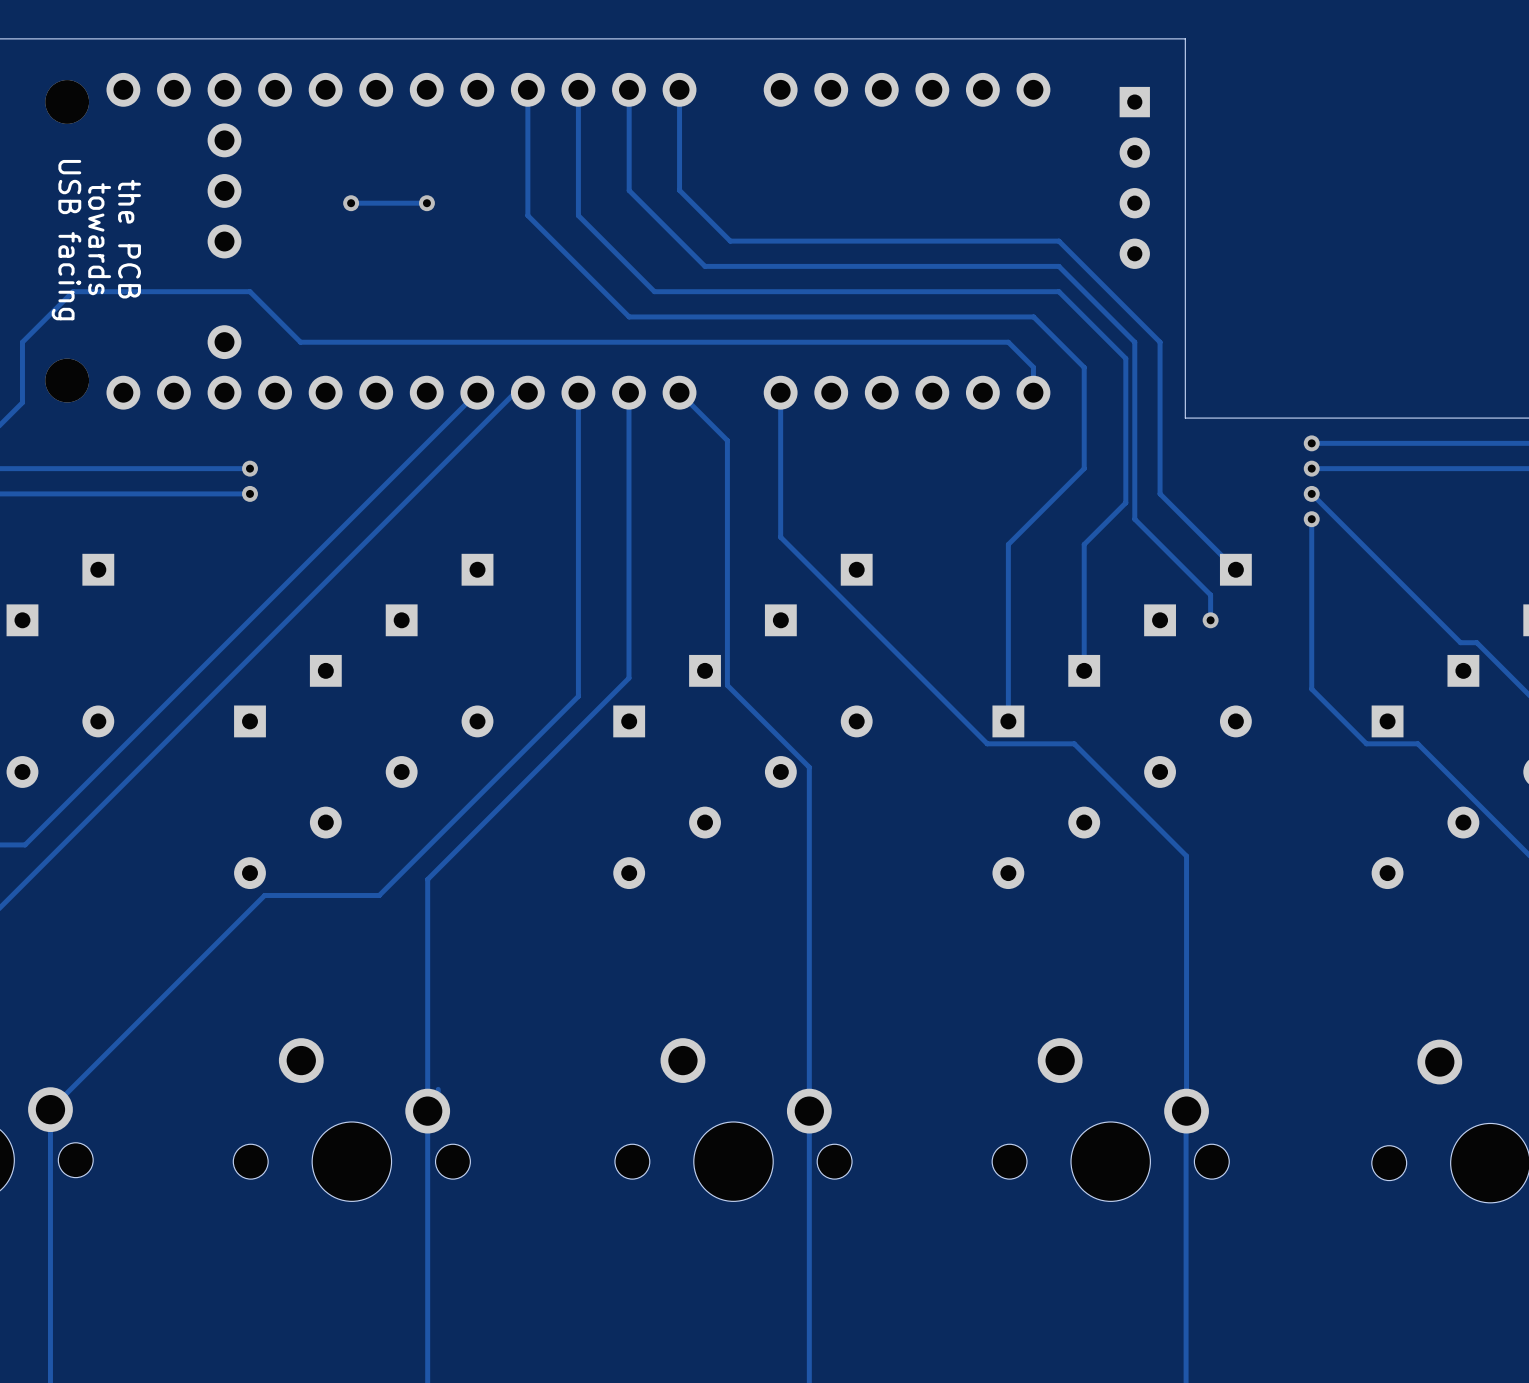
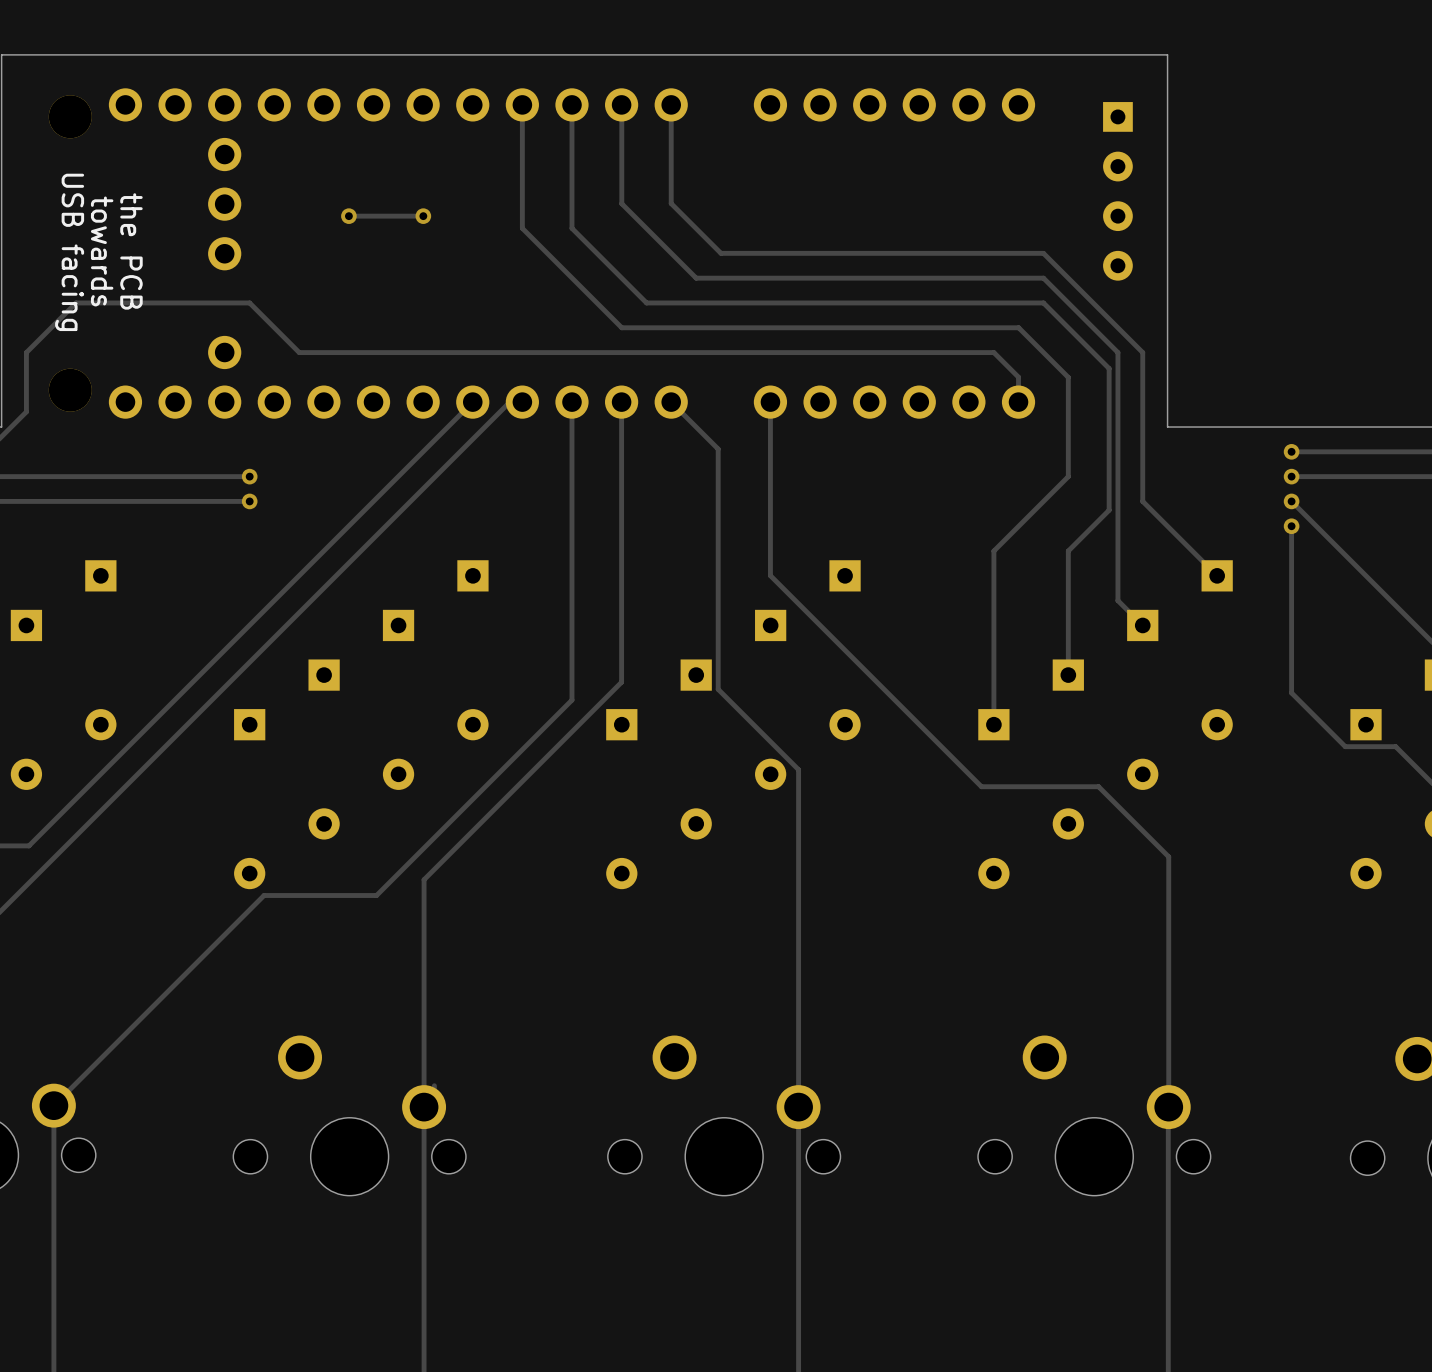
track: (1134, 519) (1210, 595) (1210, 620) -> (1117, 526) (1117, 600) (1142, 625)
track: (780, 537) (987, 743) (1074, 743) (1115, 784) -> (770, 543) (770, 575) (981, 786) (1098, 786)
via: (1210, 620) -> none

